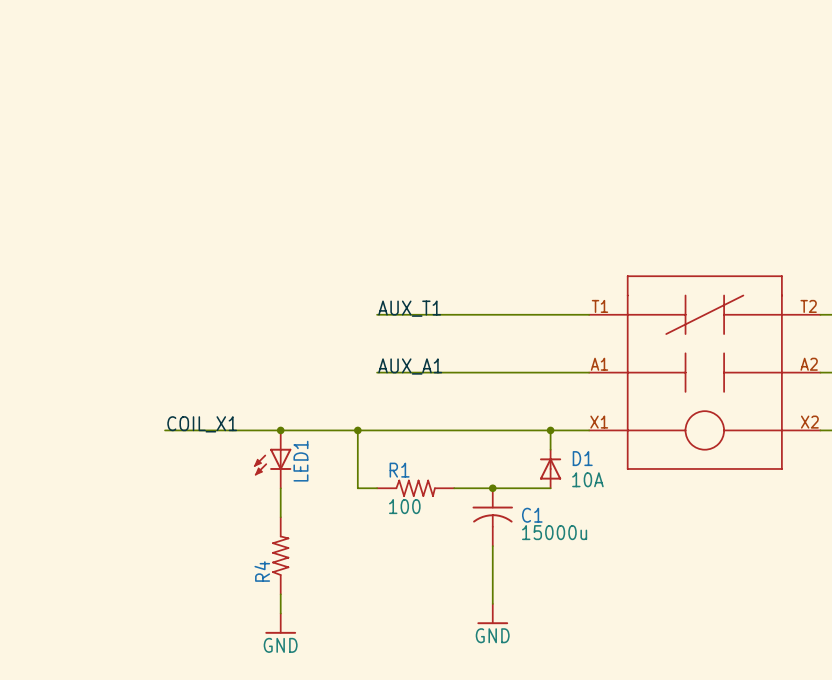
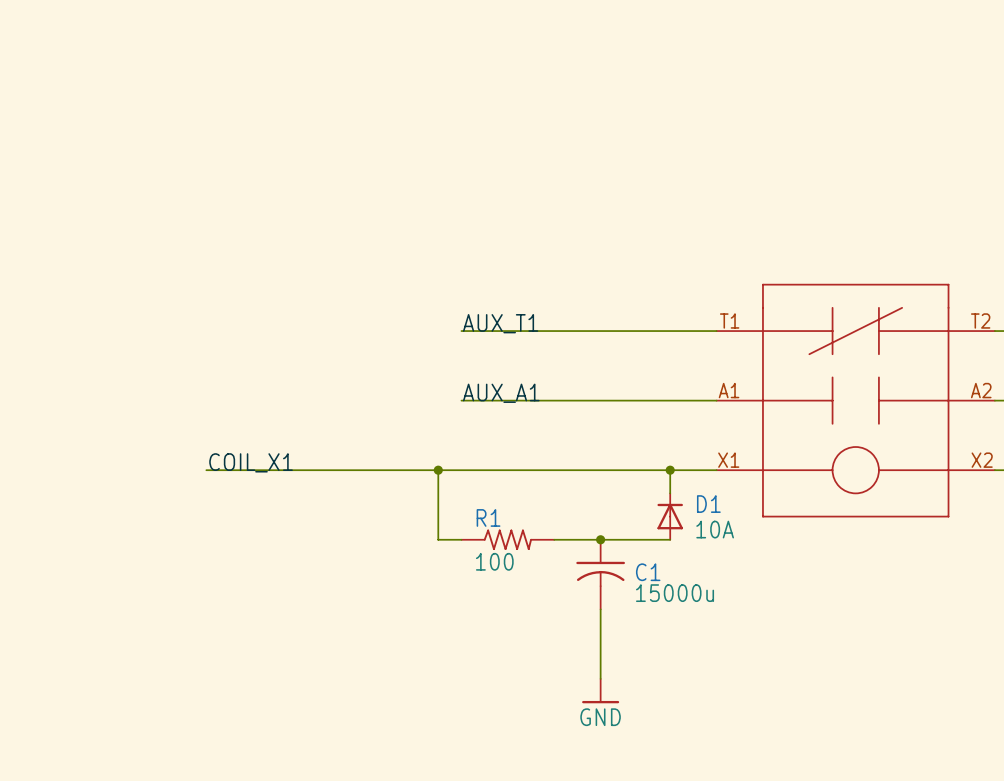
junction: (280, 430) -> none
LED1: (272, 459) -> none
wire: (280, 488) (280, 517) -> none
R4: (280, 555) -> none
wire: (280, 594) (280, 613) -> none
power symbol: GND (280, 623) -> none

